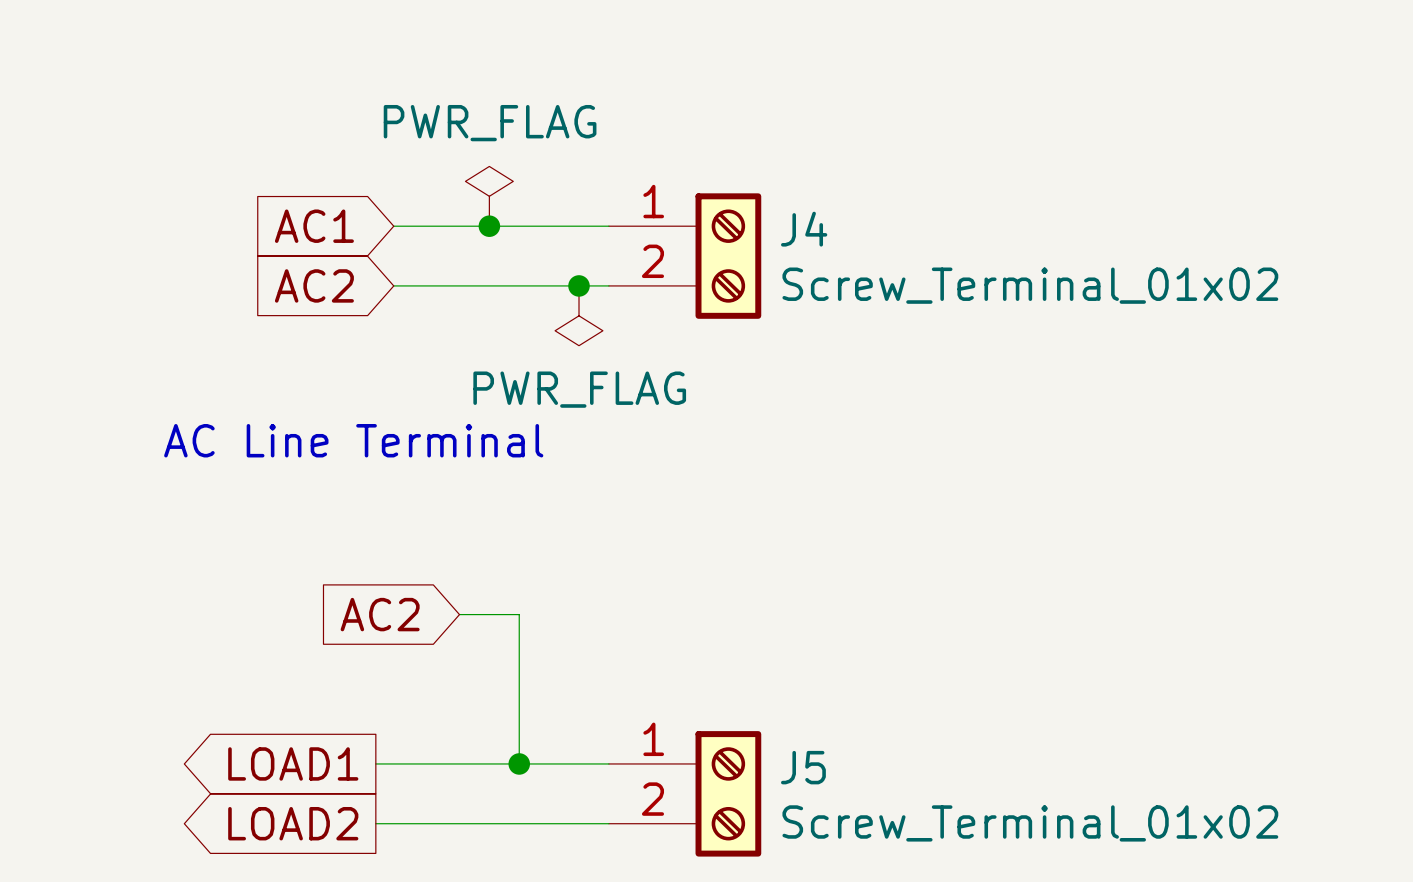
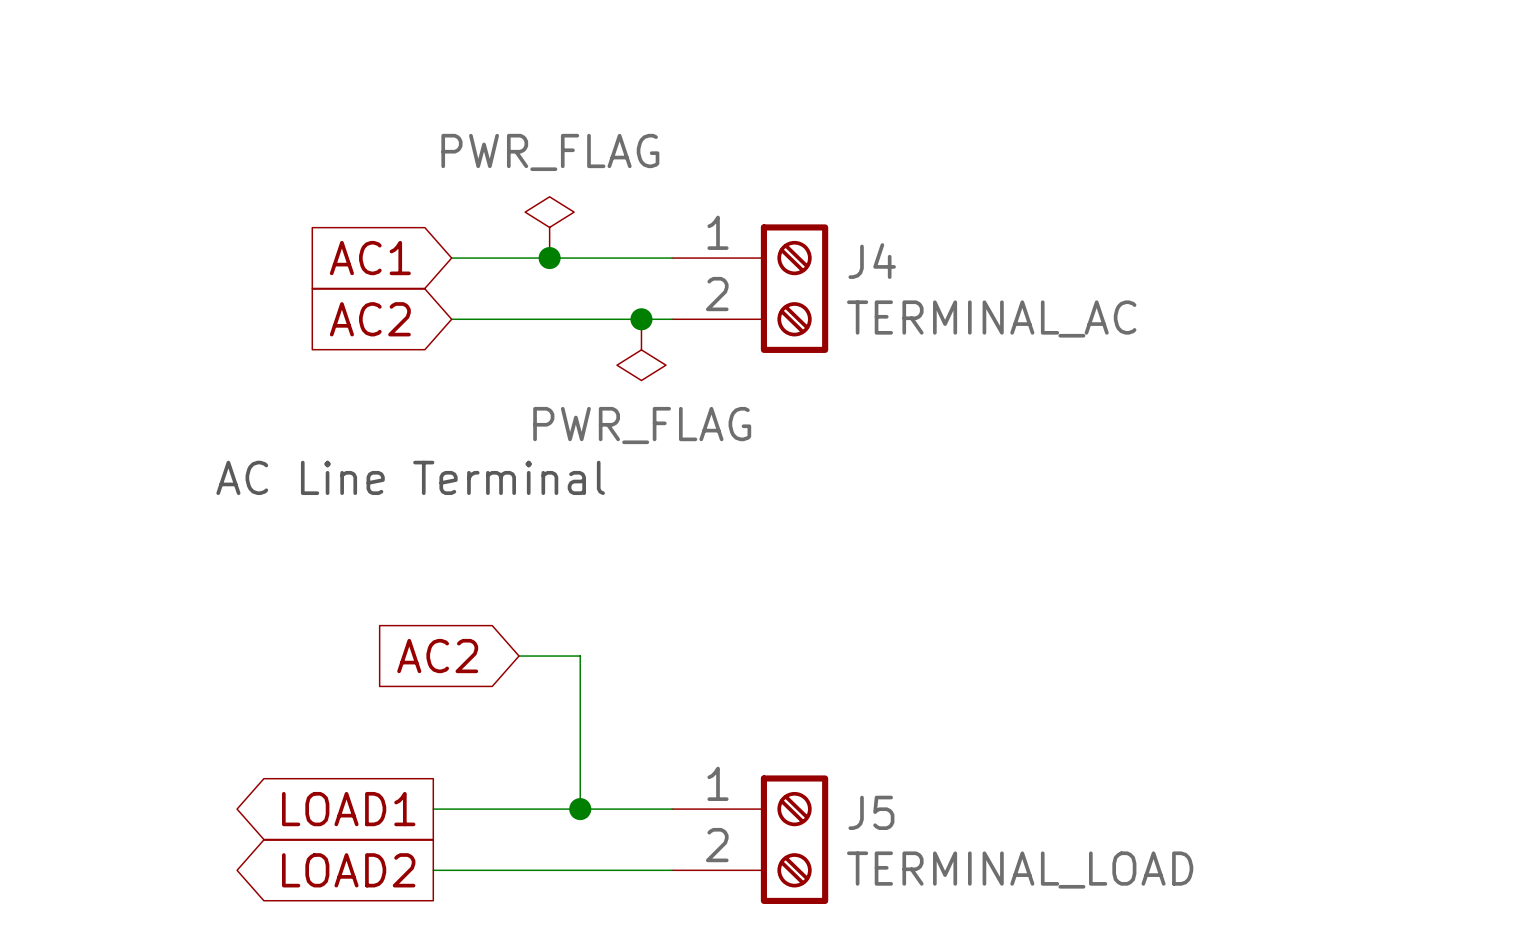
J4 value: Screw_Terminal_01x02 (1030, 285) -> TERMINAL_AC (991, 318)
J5 value: Screw_Terminal_01x02 (1030, 823) -> TERMINAL_LOAD (1020, 870)

